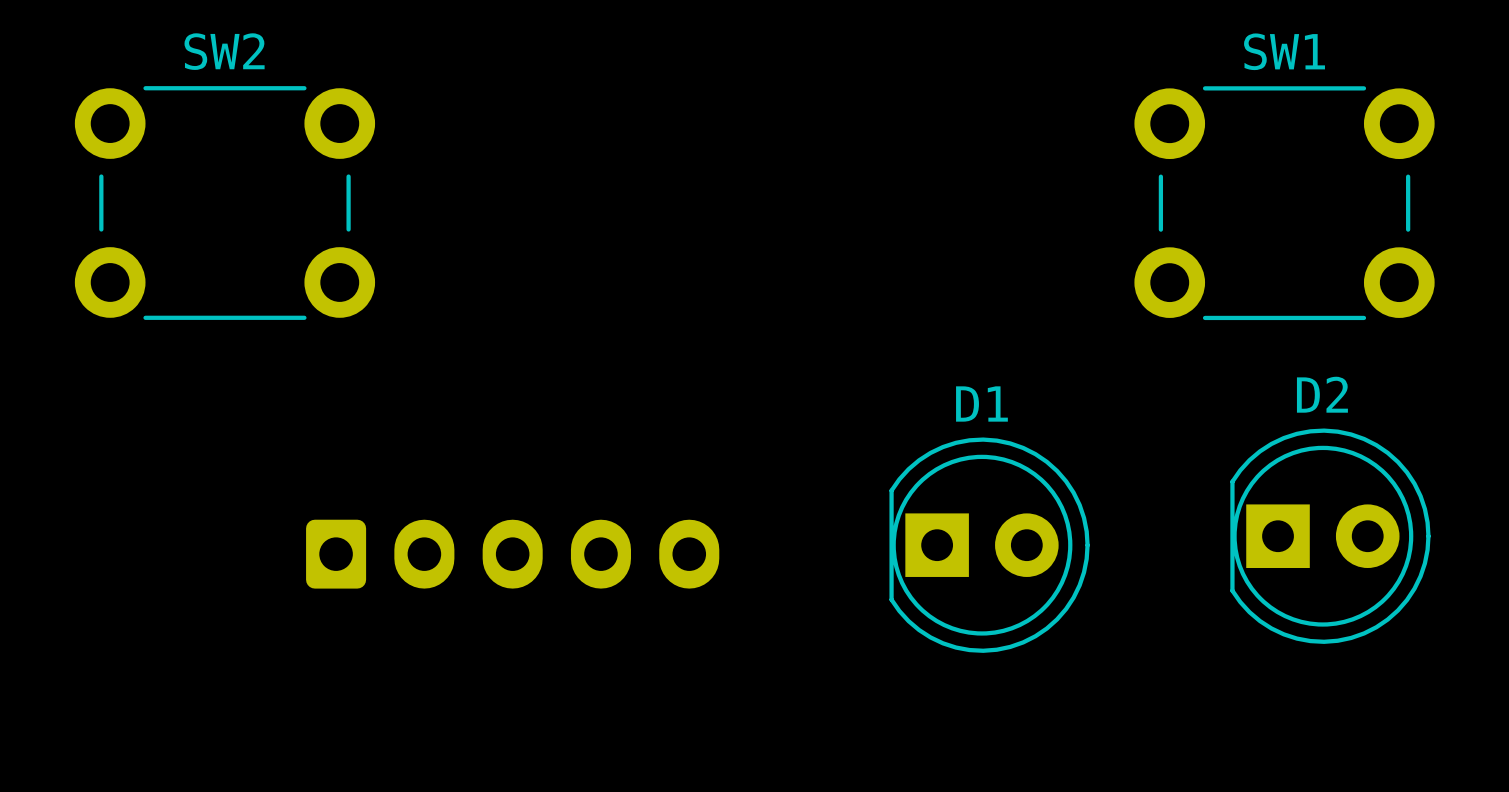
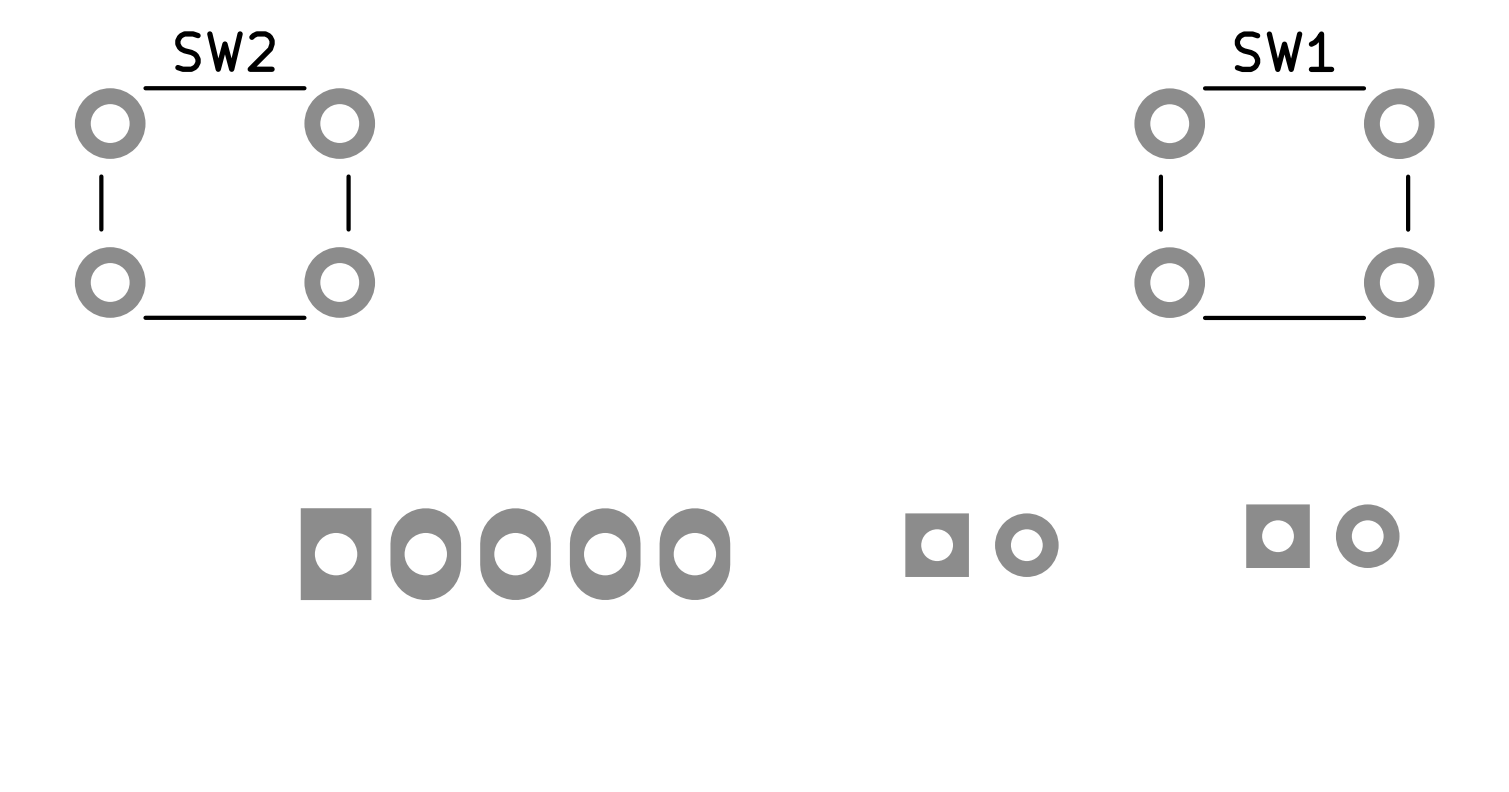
part footprint: [306, 519, 720, 589] -> [300, 508, 731, 601]
D2 side: top (1330, 536) -> bottom (1322, 536)
D1 side: top (989, 545) -> bottom (981, 545)

